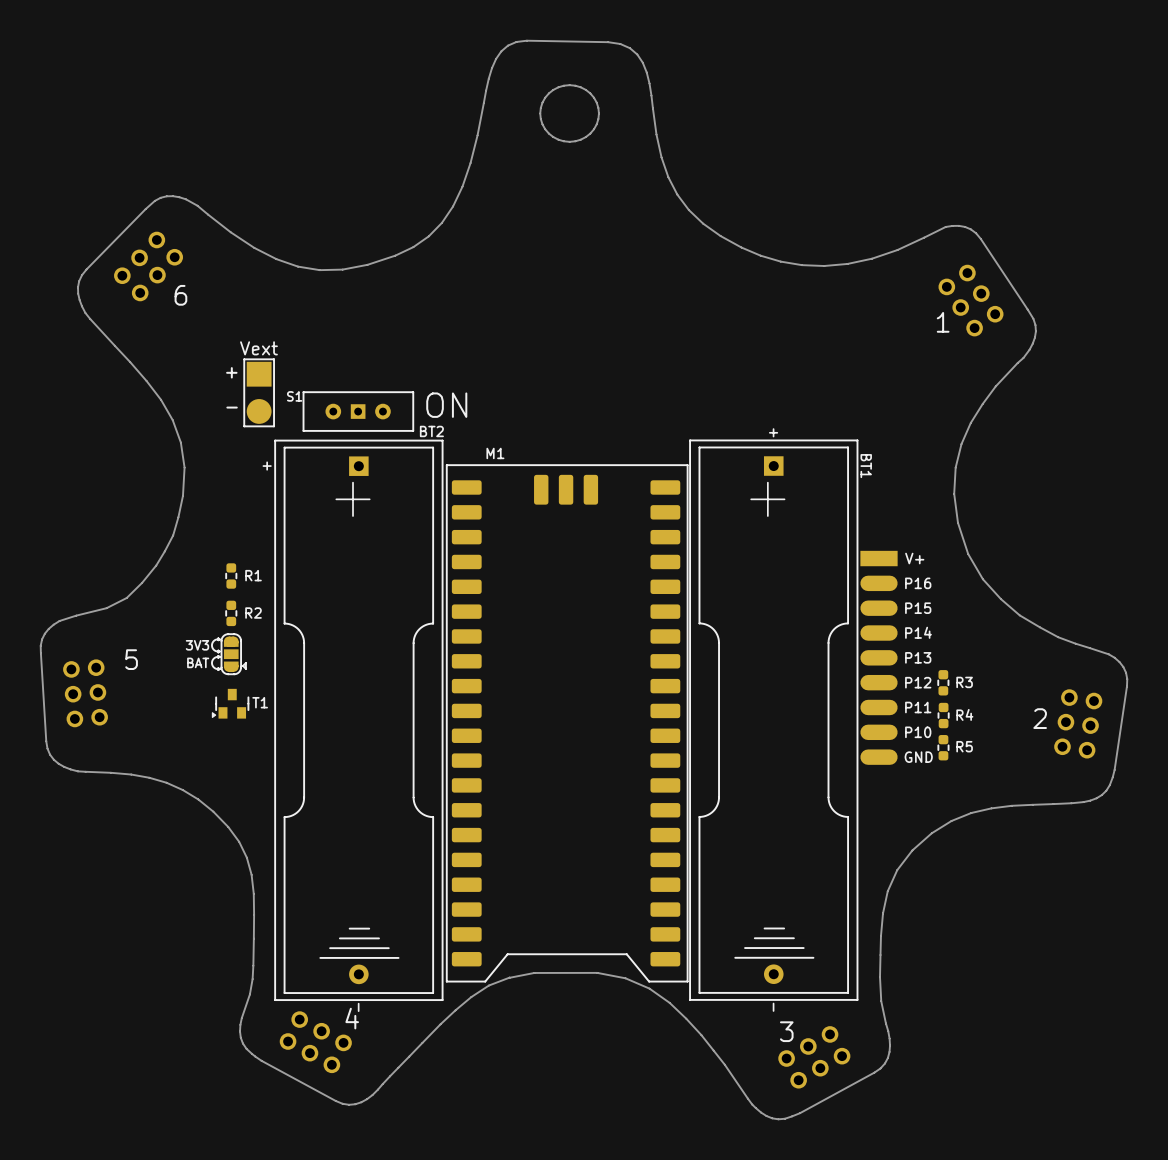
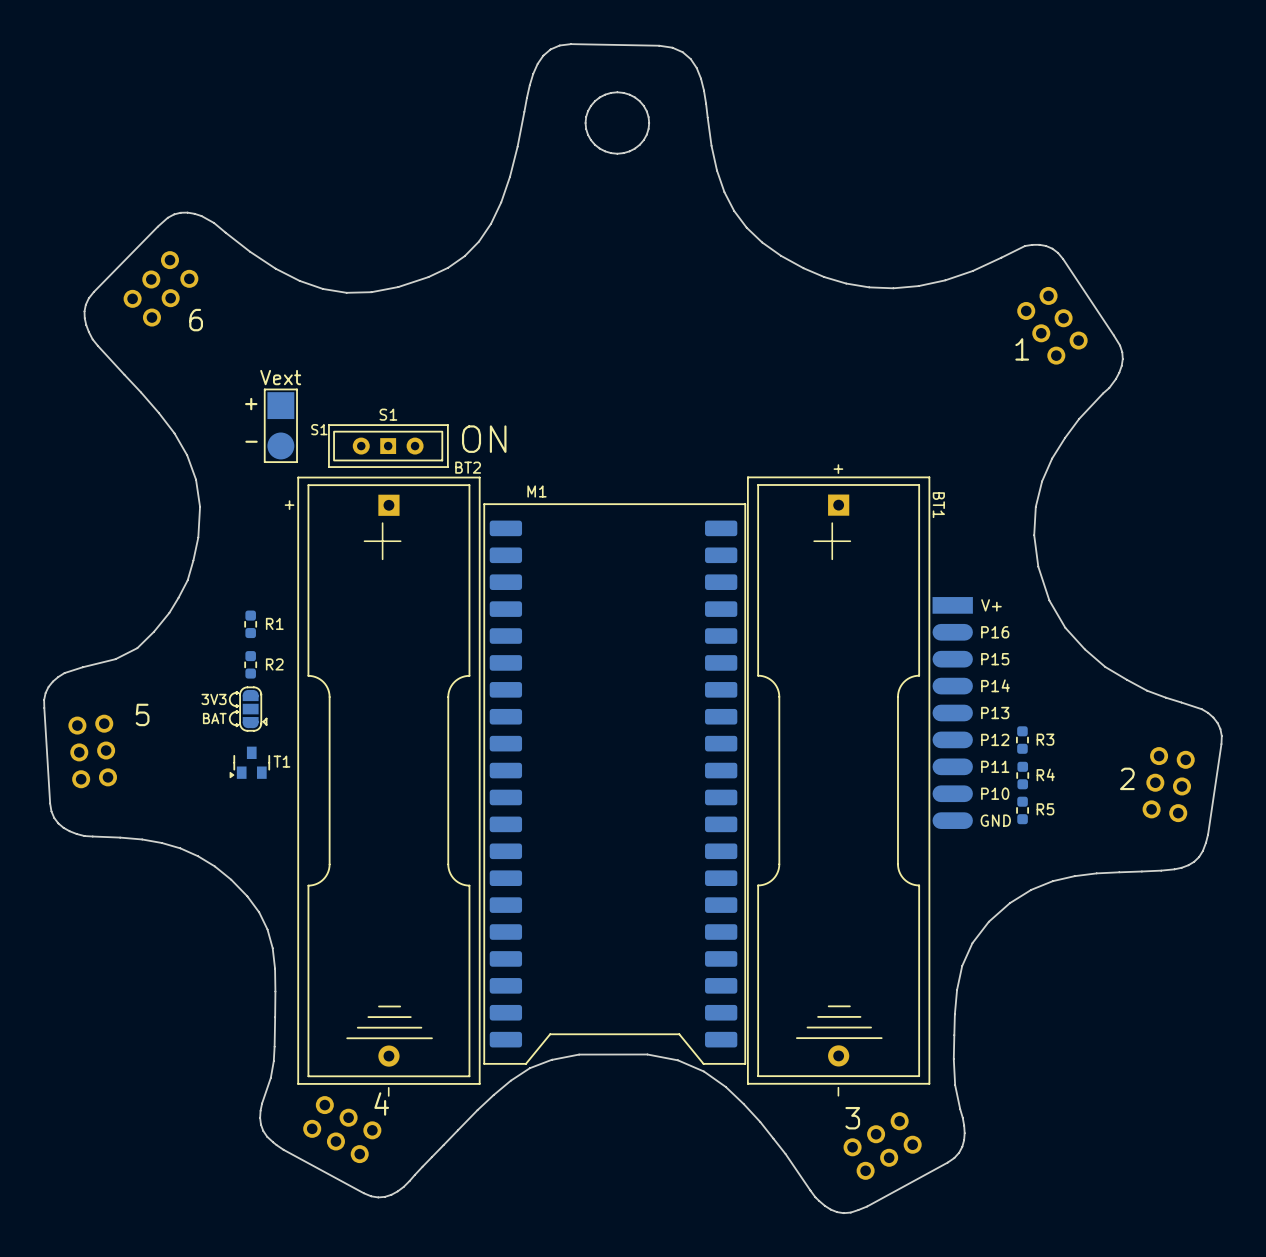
S1 side: top (358, 411) -> bottom (388, 446)
M1 footprint: [446, 464, 689, 983] -> [483, 503, 746, 1065]

